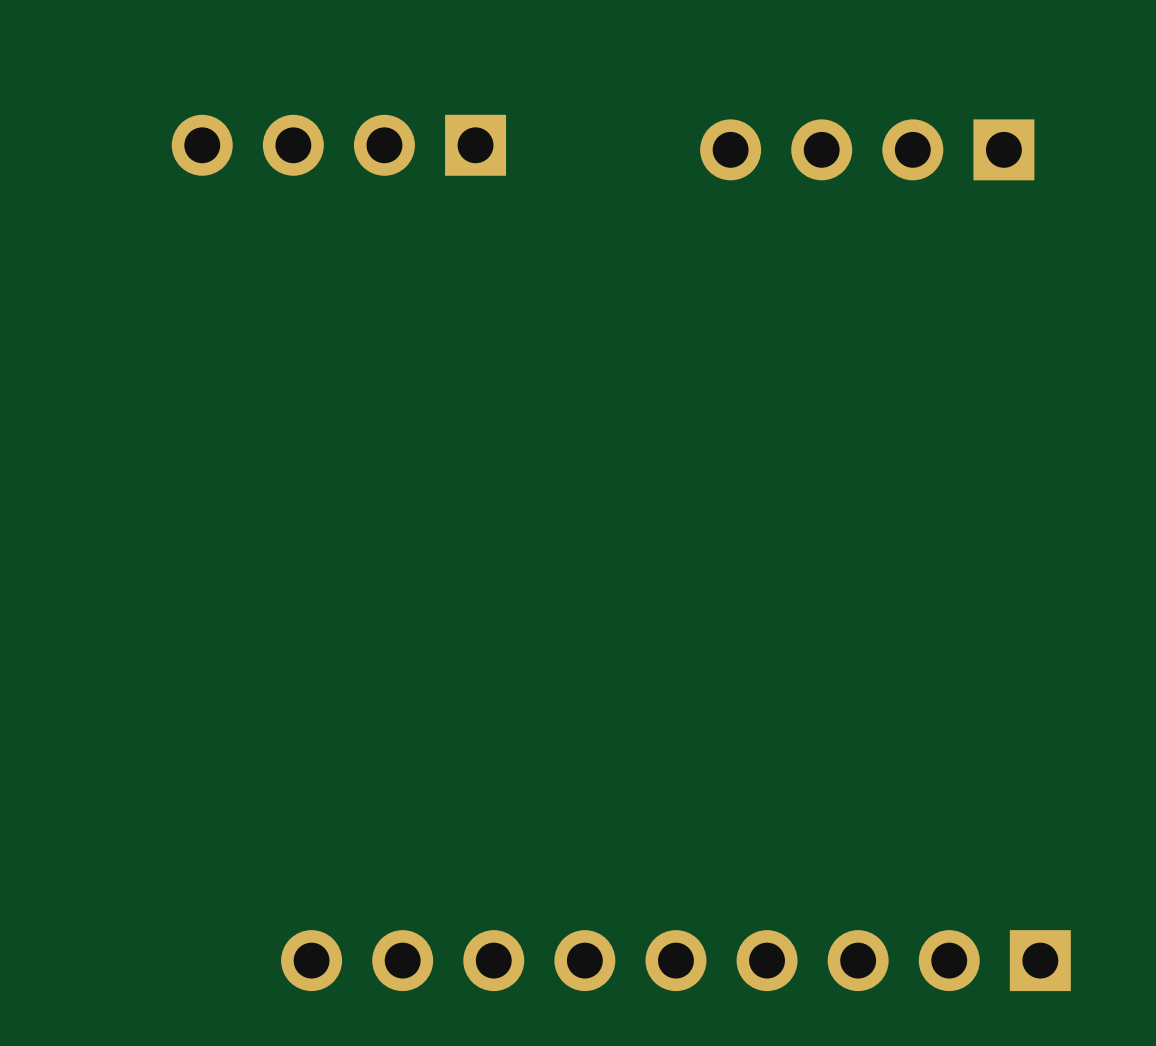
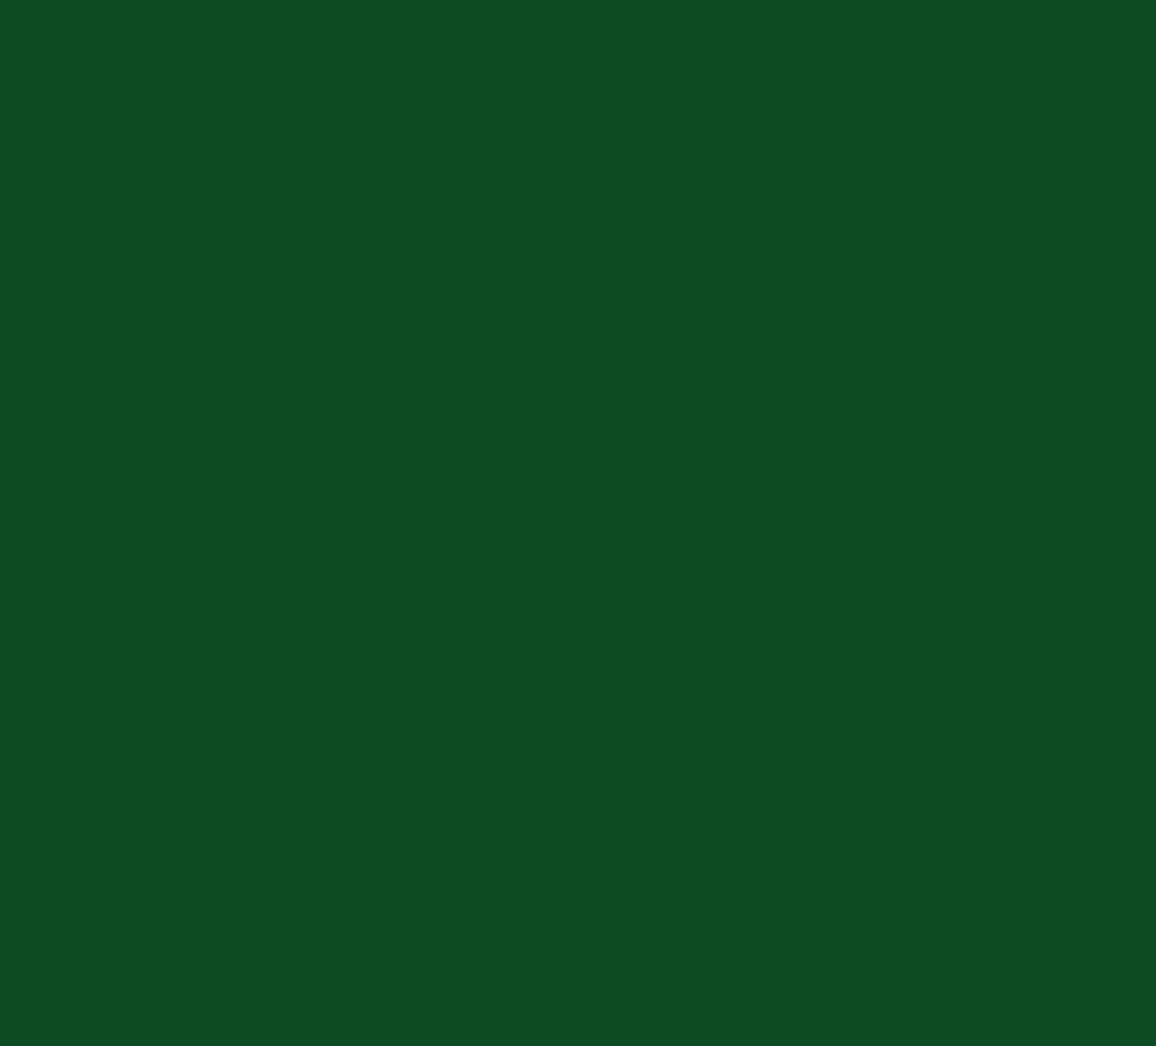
part: (338, 145) -> none
part: (867, 149) -> none
part: (675, 960) -> none

